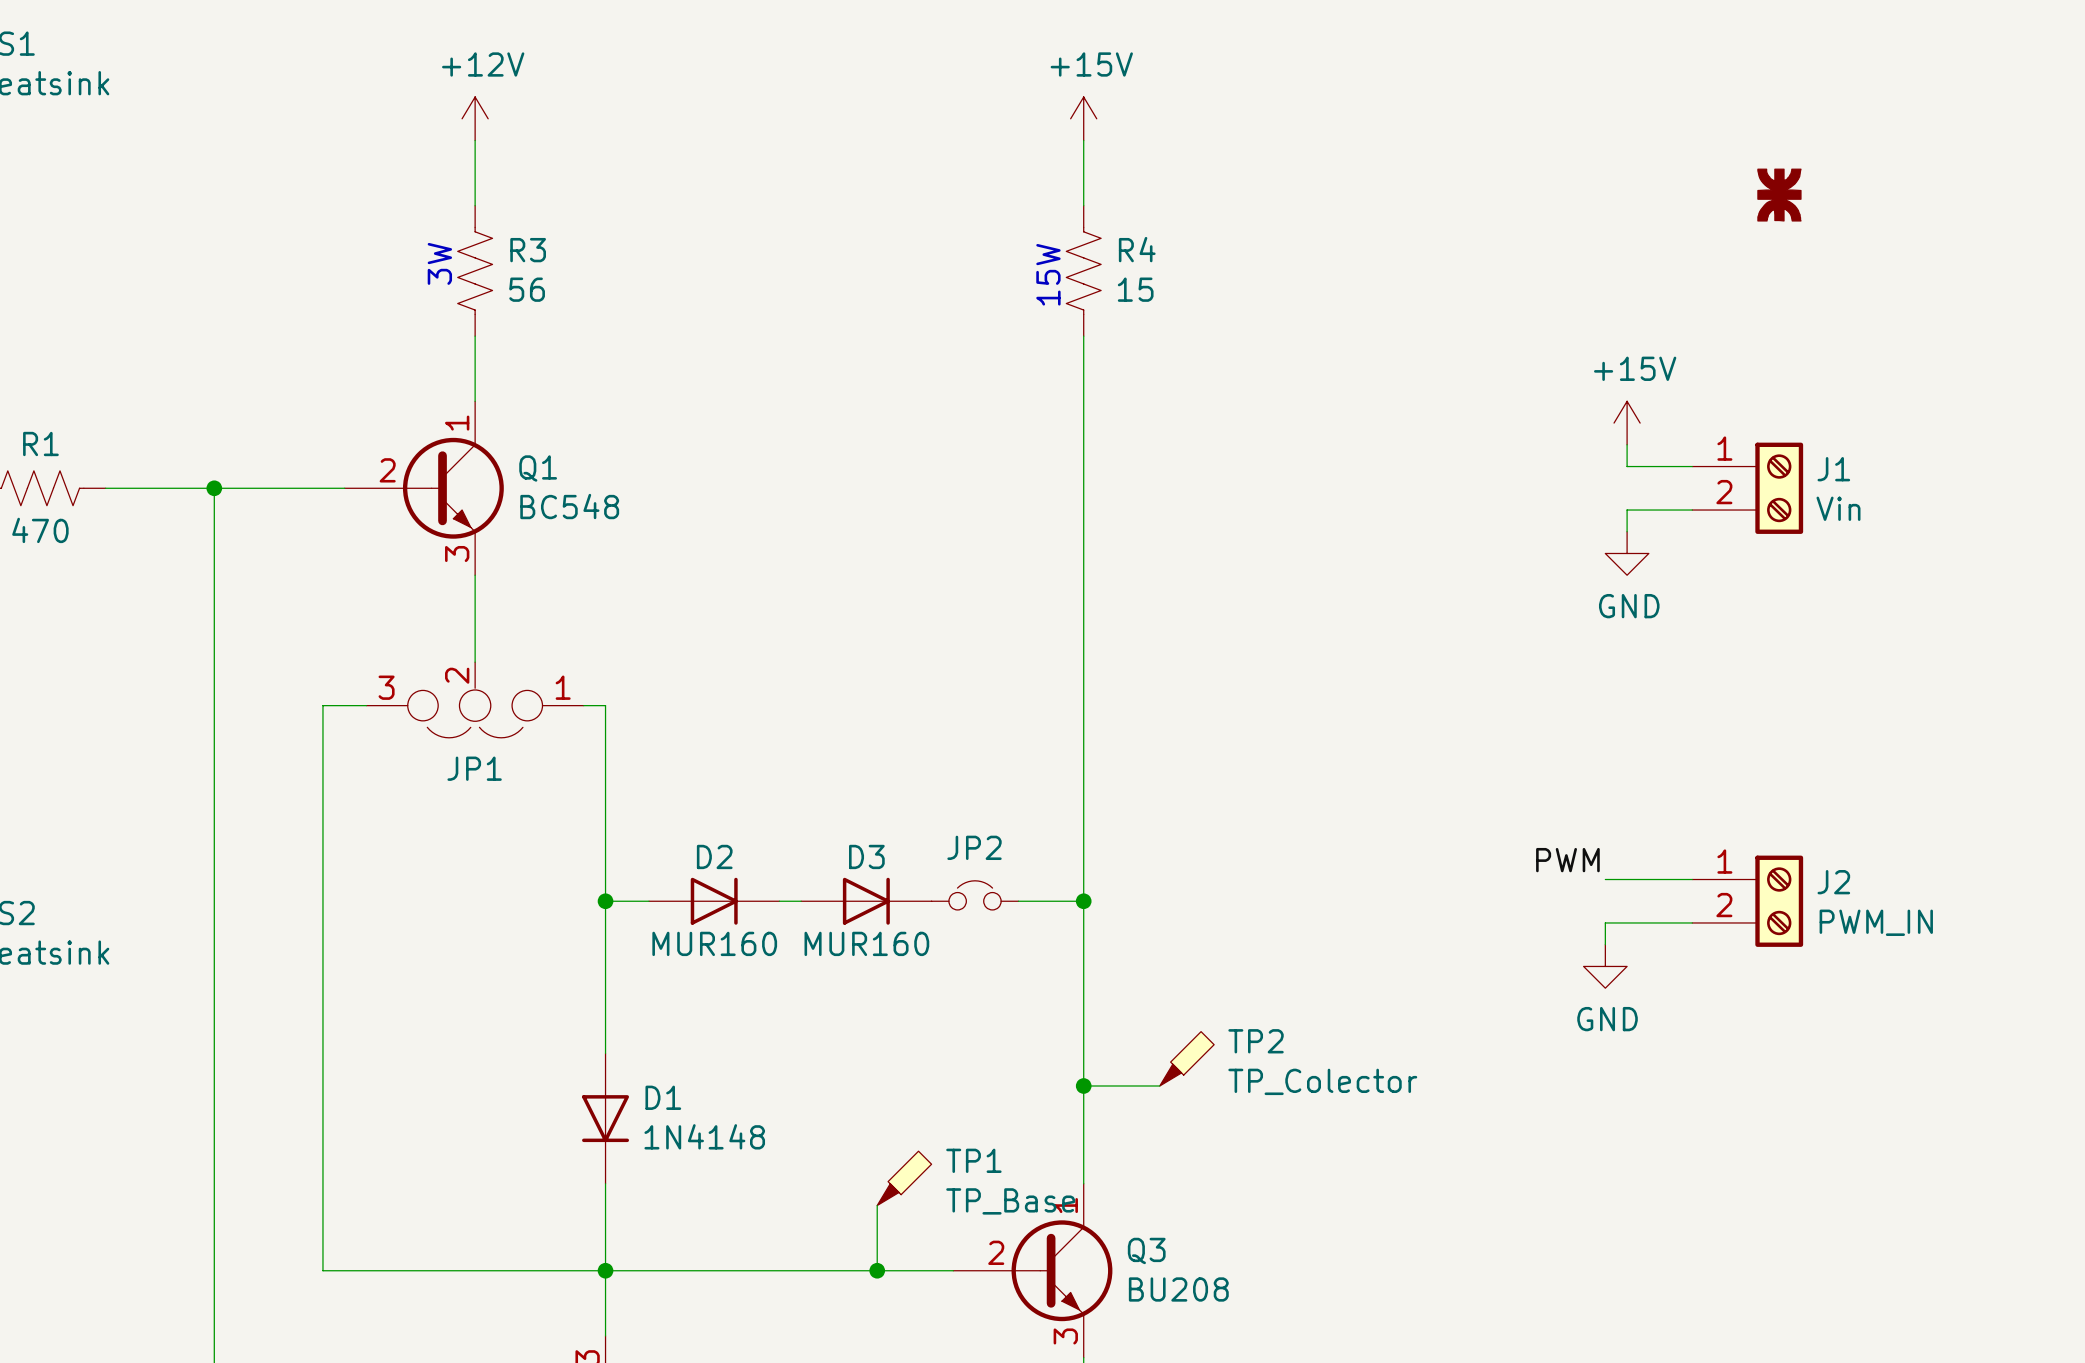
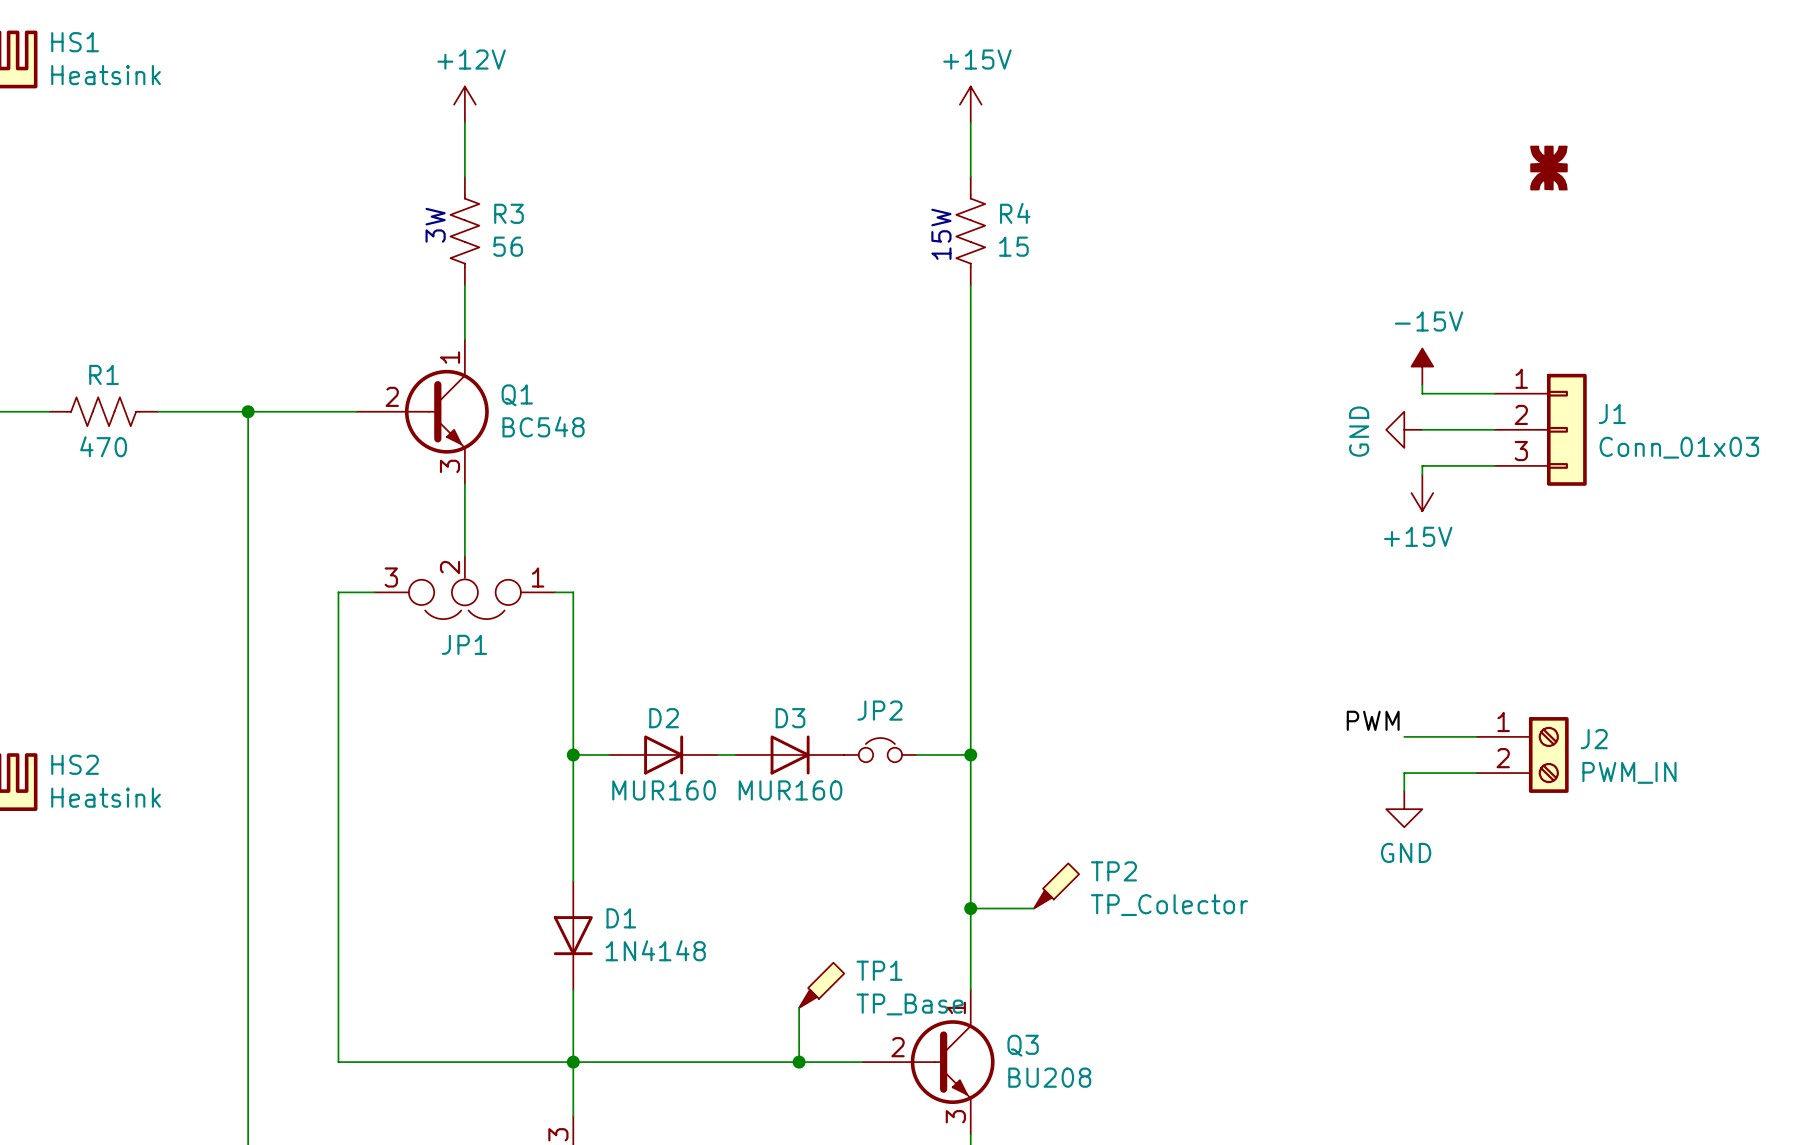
power symbol: +15V (1627, 423) -> -15V (1422, 366)
J1 symbol: [1692, 442, 1804, 534] -> [1494, 373, 1587, 486]
J1 value: Vin (1838, 508) -> Conn_01x03 (1679, 447)
wire: (1627, 510) (1627, 531) -> none
power symbol rotation: 0° (1627, 553) -> 90° clockwise (1404, 429)
power symbol position: GND (1627, 553) -> GND (1404, 429)
wire: none -> (1494, 465) (1422, 465) (1422, 474)
power symbol: none -> +15V (1422, 493)

